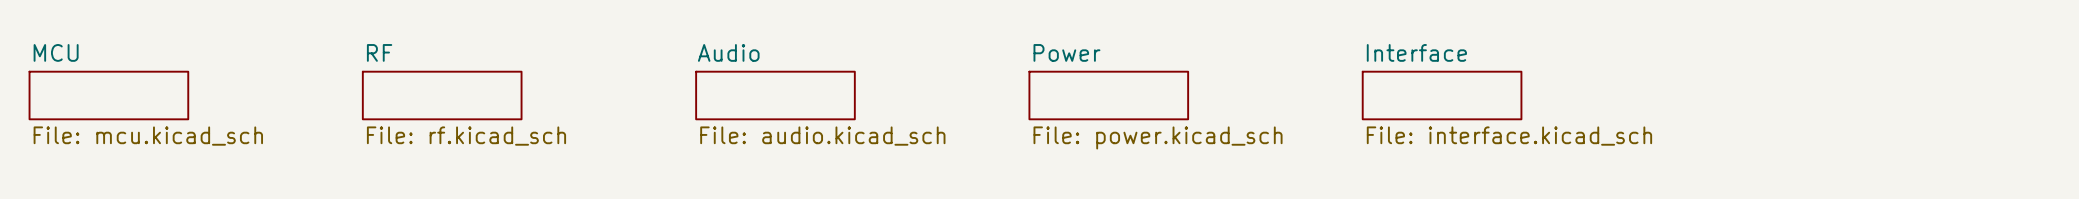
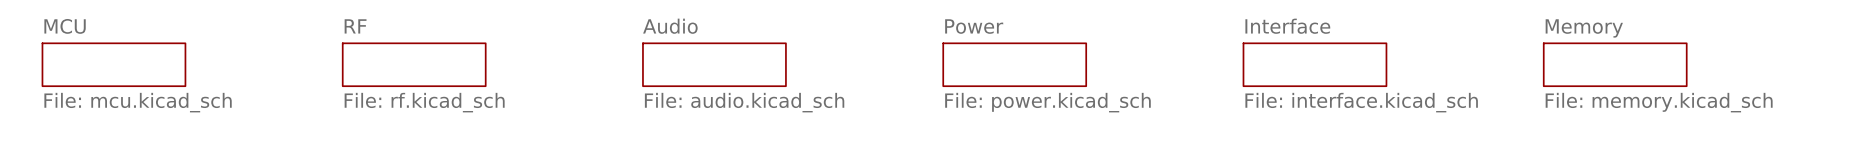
sheet Memory: none -> File: memory.kicad_sch (1615, 64)

